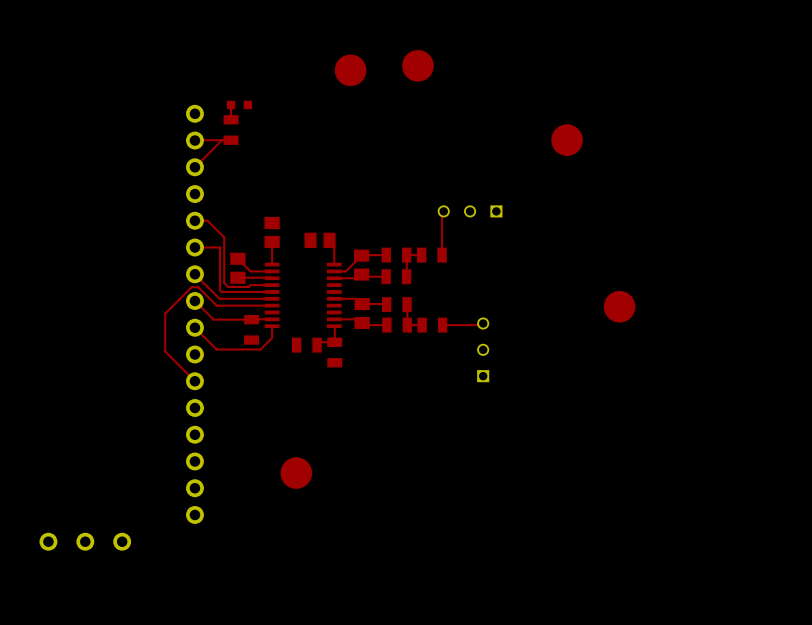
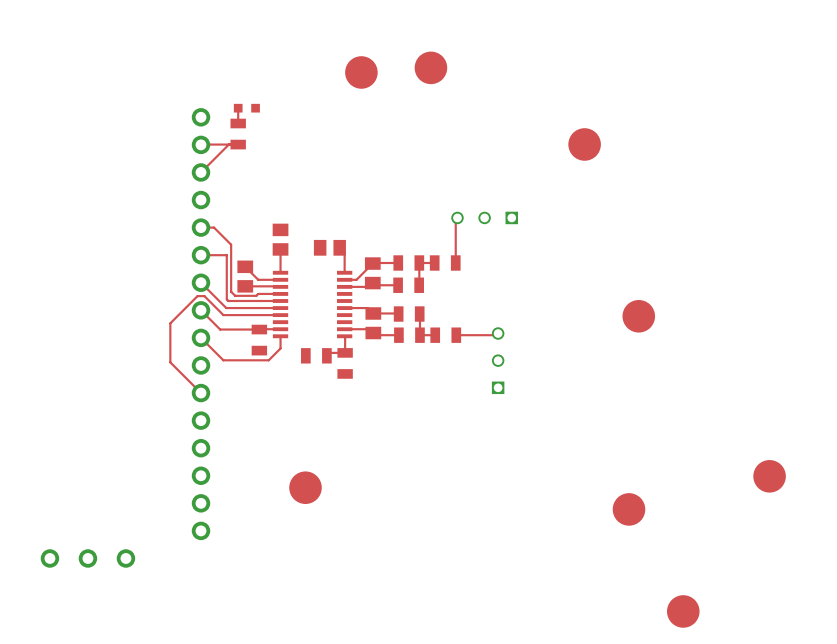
part: none -> (769, 476)
part: none -> (629, 509)
part: none -> (683, 611)

